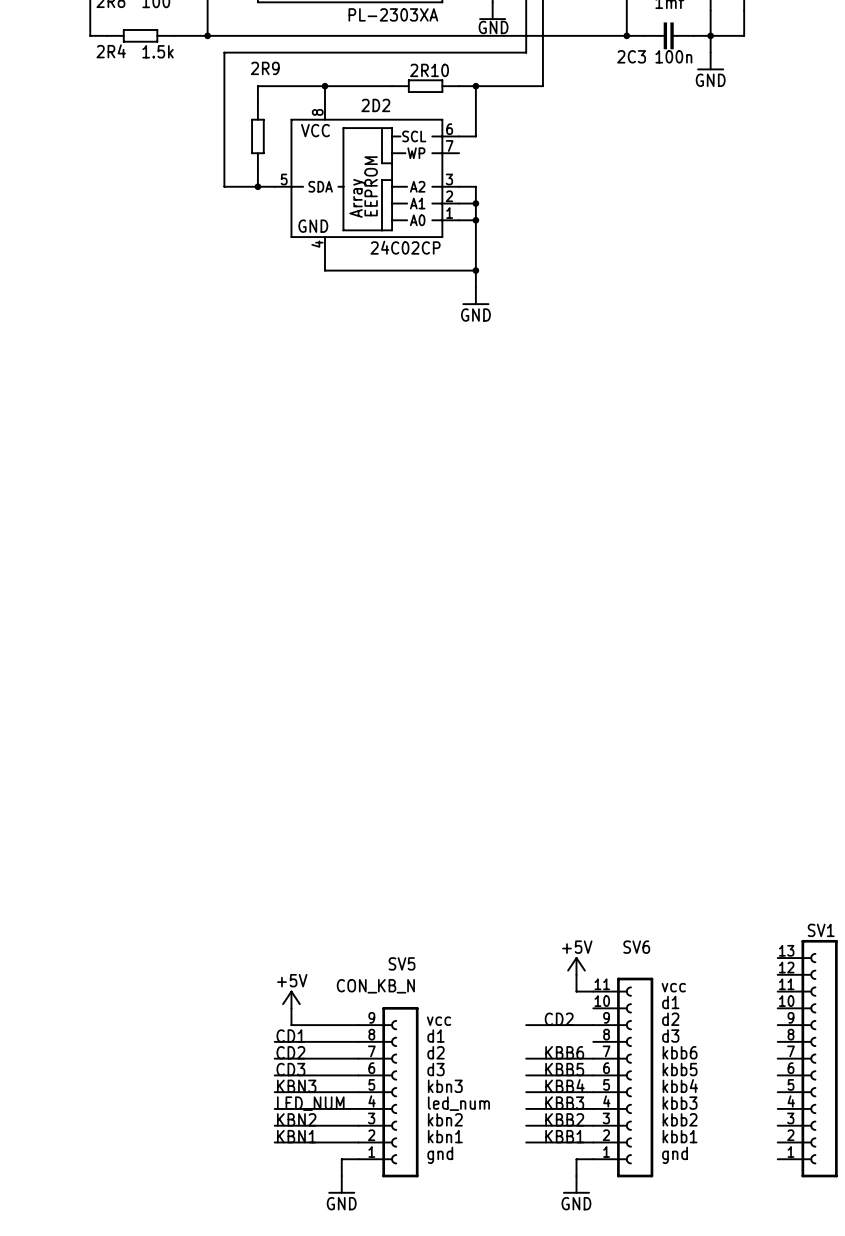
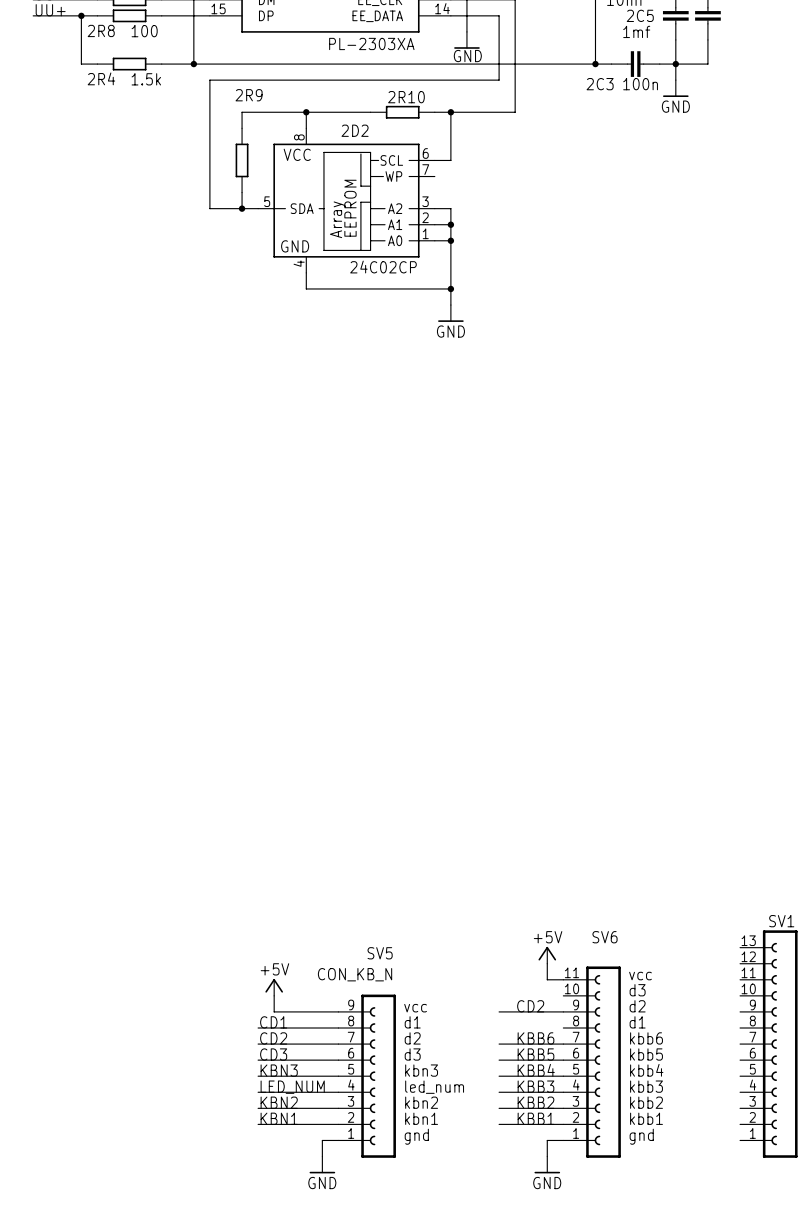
text: d1 (670, 1002) -> d3 (637, 990)
text: d3 (670, 1036) -> d1 (637, 1022)

